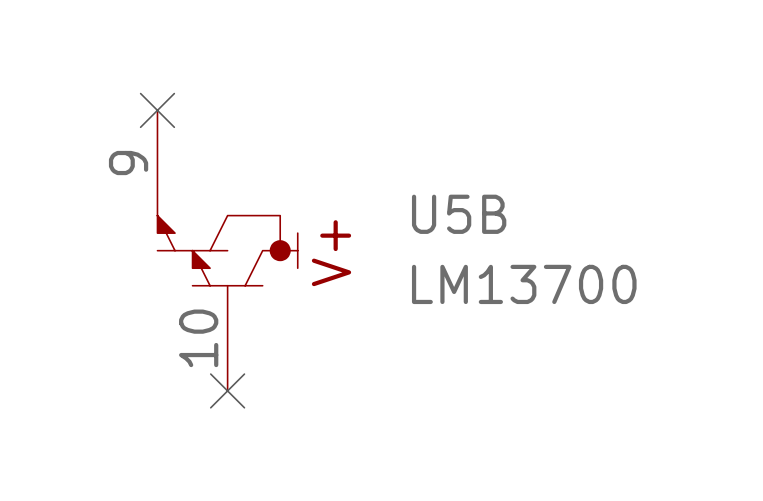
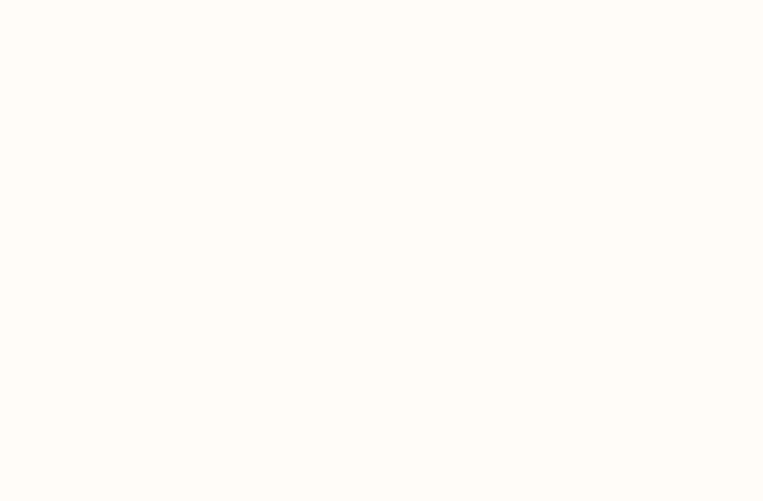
no-connect mark: (157, 110) -> none
U5B: LM13700 (227, 250) -> none
no-connect mark: (227, 390) -> none

